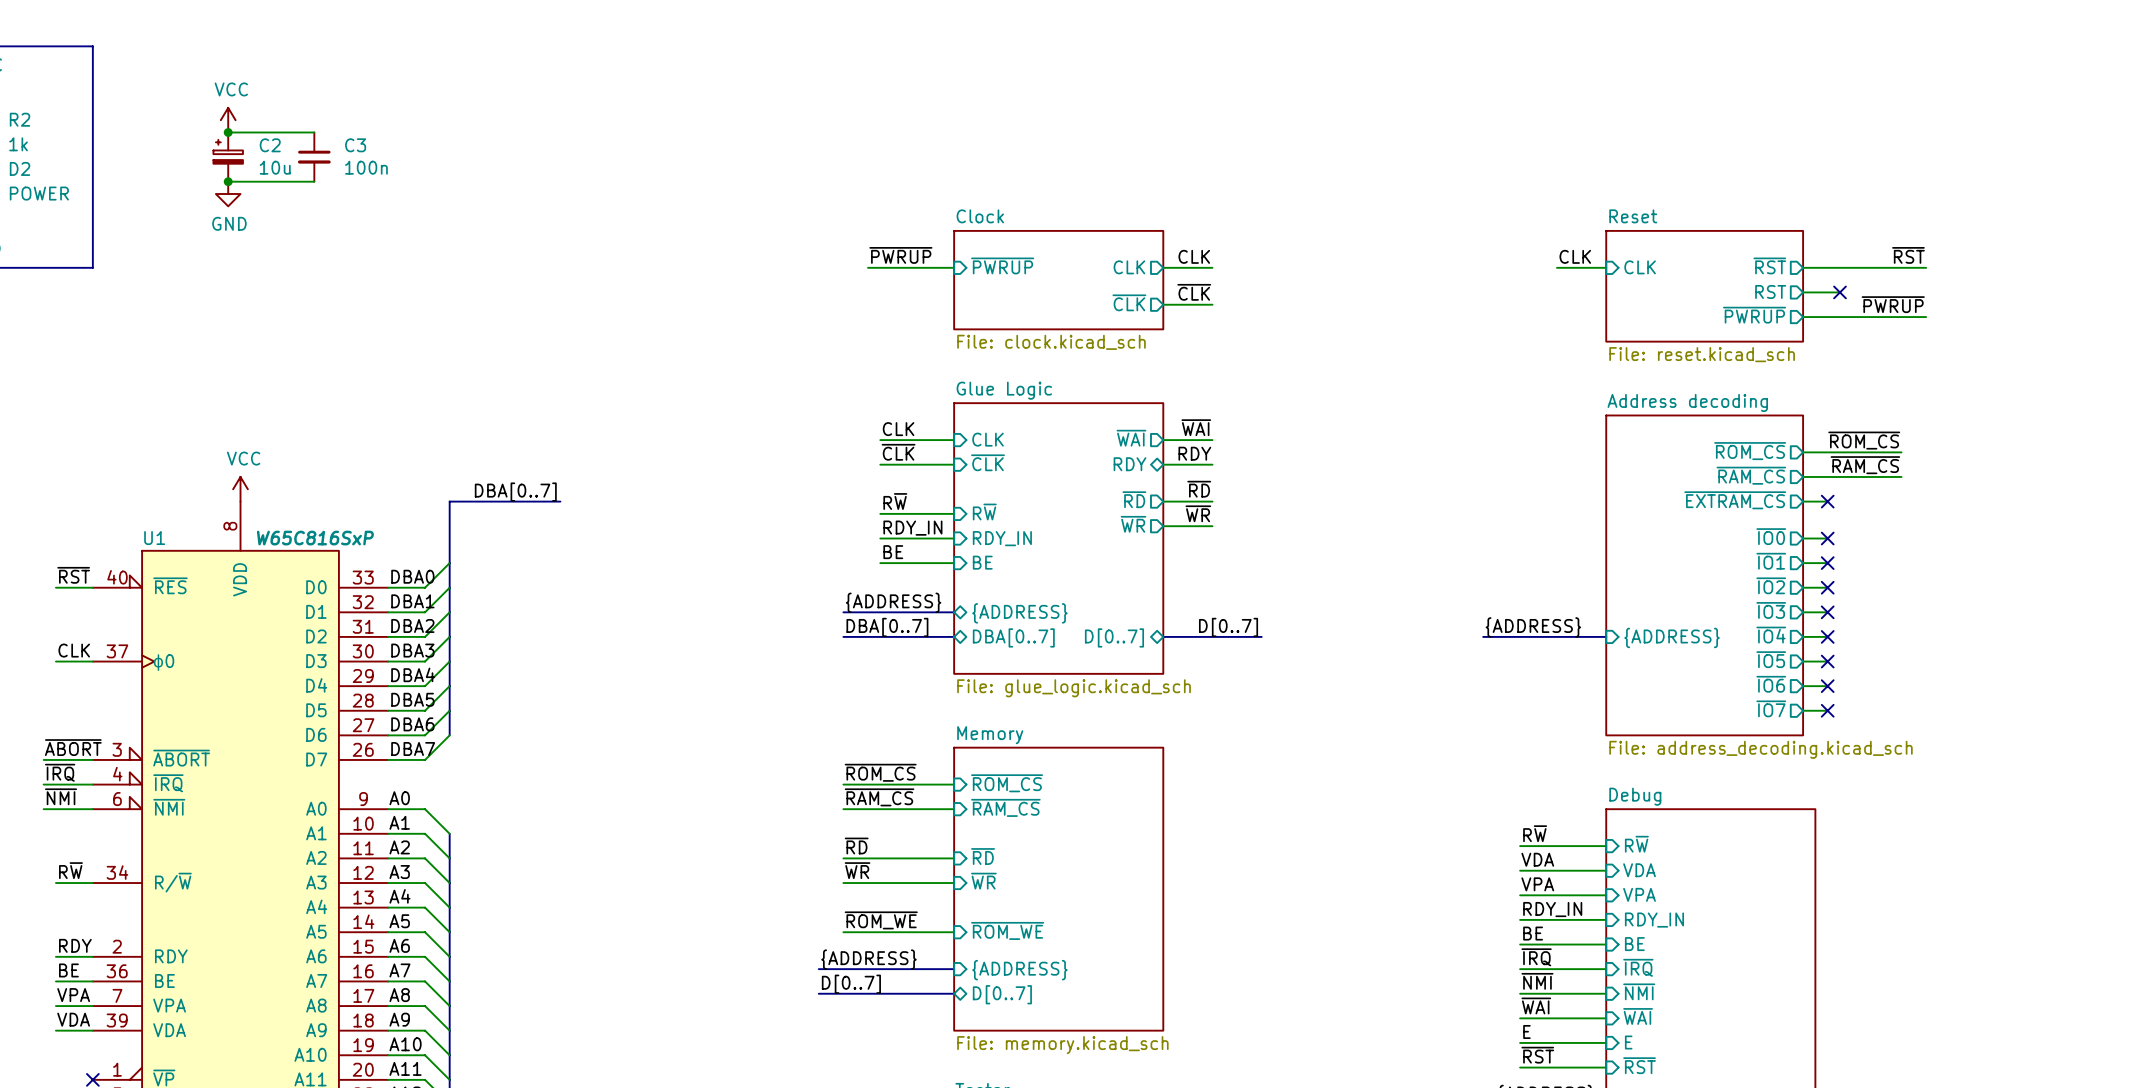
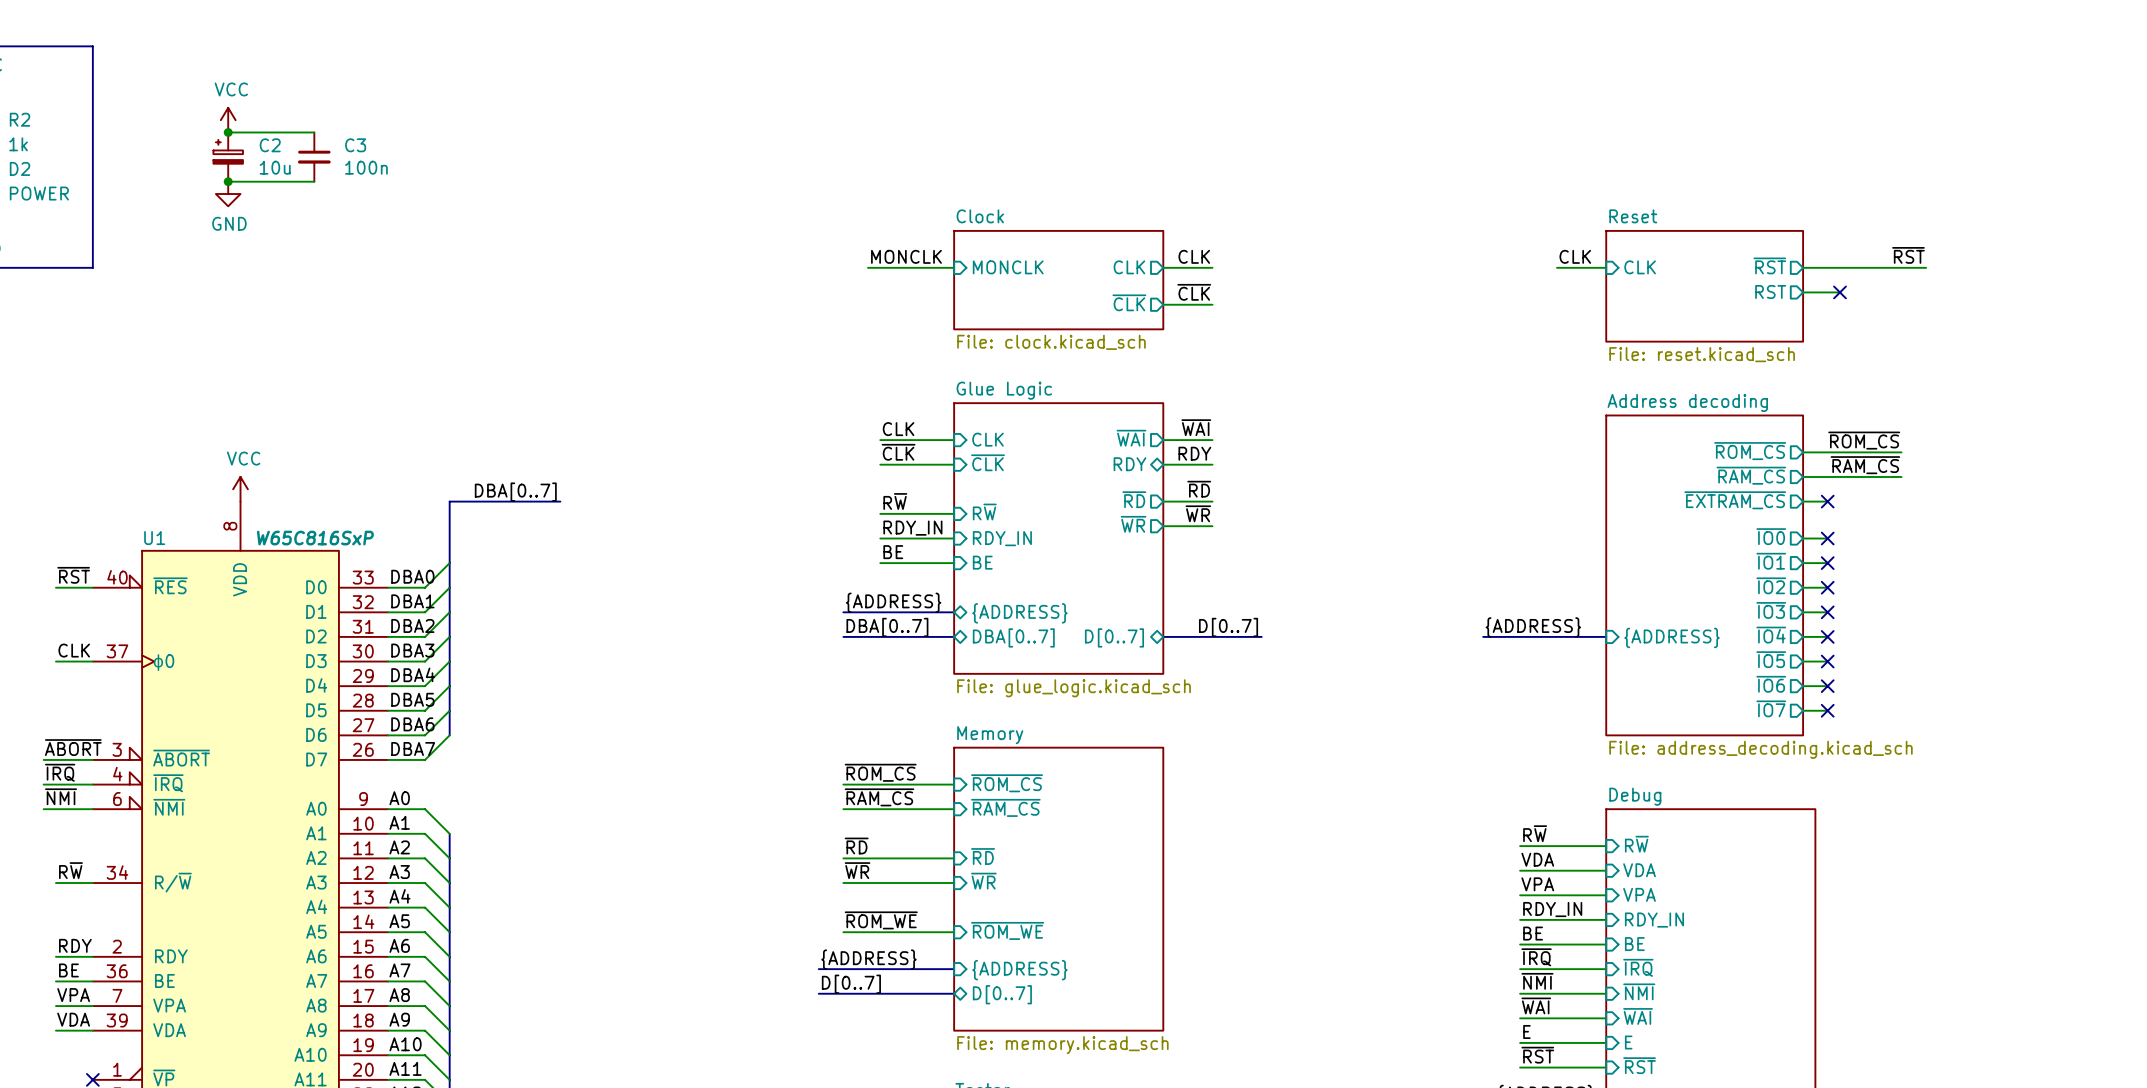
label: ~{PWRUP} (900, 255) -> MONCLK (906, 256)
sheet pin: ~{PWRUP} (1002, 265) -> MONCLK (1008, 267)
label: ~{PWRUP} (1893, 304) -> none
sheet pin: ~{PWRUP} (1754, 315) -> none
wire: (1803, 317) (1926, 317) -> none

